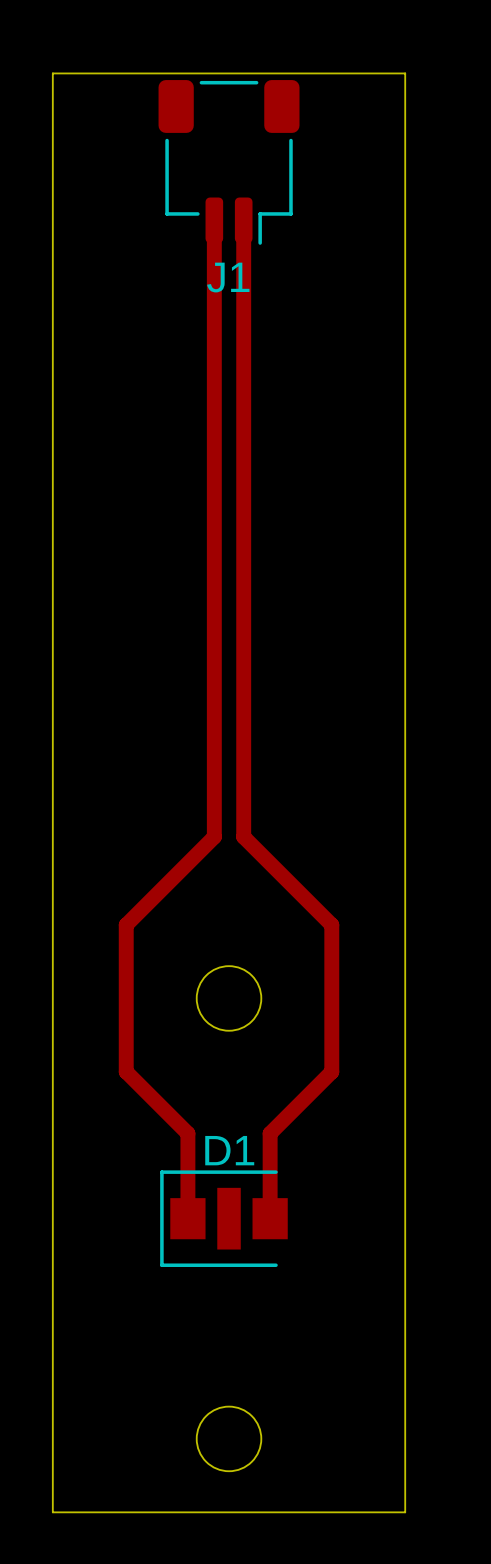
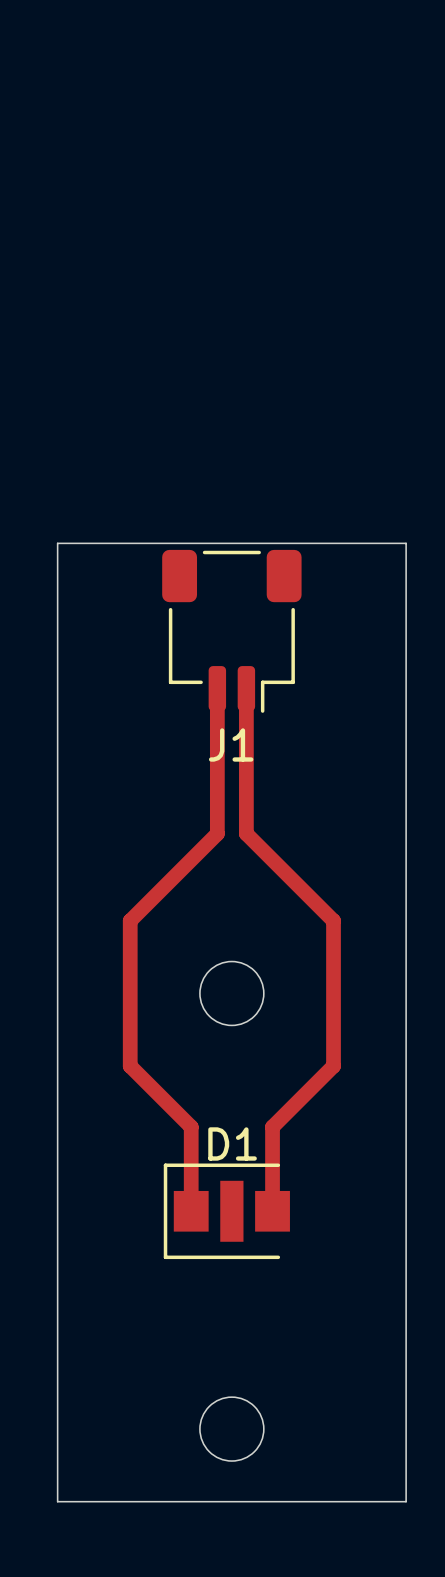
J1 position: (229, 162) -> (231, 631)
top track: (214, 220) (214, 690) -> none
top track: (243, 220) (243, 690) -> none
board edge: (52, 543) (52, 73) (405, 73) (405, 543) -> (57, 543) (406, 543)

